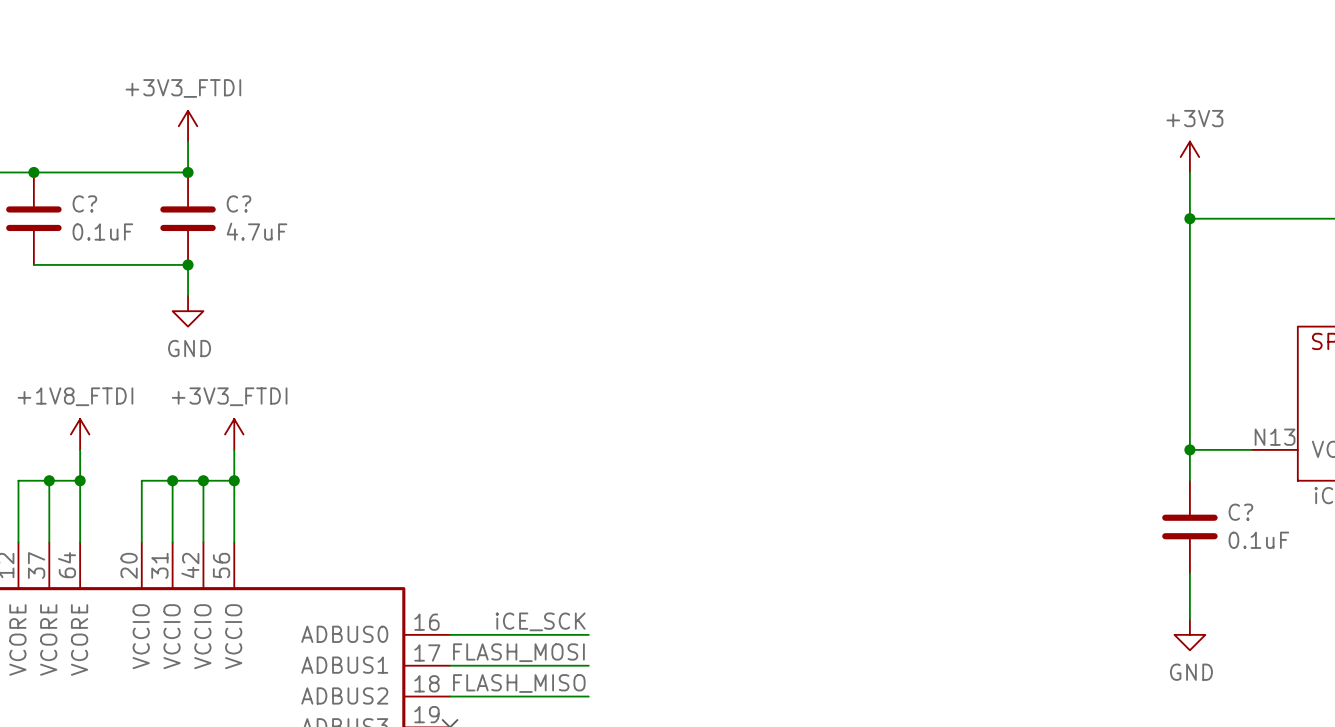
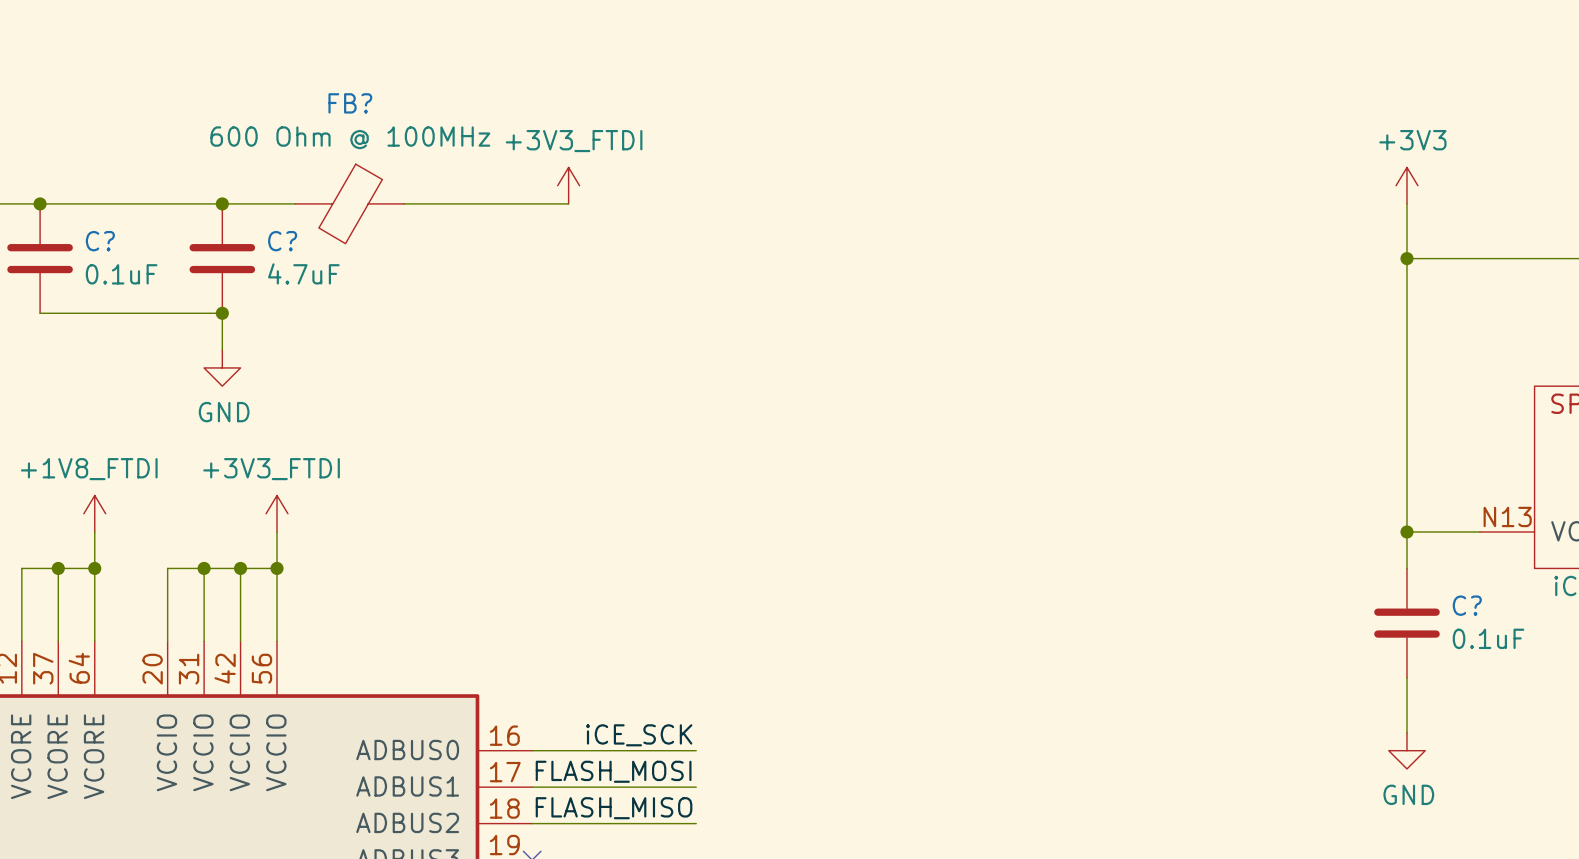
power symbol text position: +3V3_FTDI (183, 88) -> +3V3_FTDI (574, 141)
power symbol position: +3V3_FTDI (188, 126) -> +3V3_FTDI (568, 185)
wire: (188, 141) (188, 172) -> (295, 203) (222, 203)
FB?: none -> (349, 203)
wire: none -> (404, 203) (568, 203)

